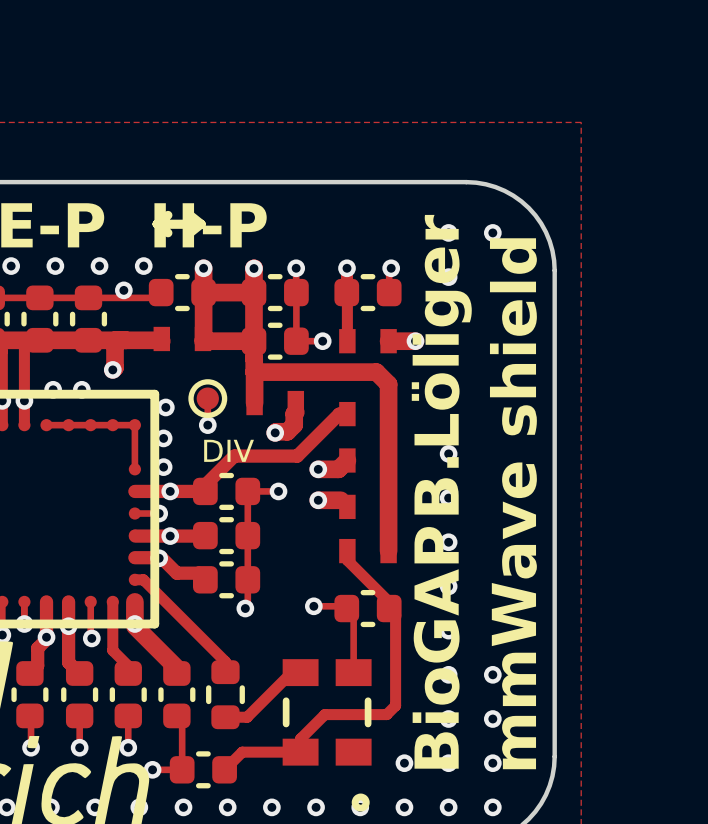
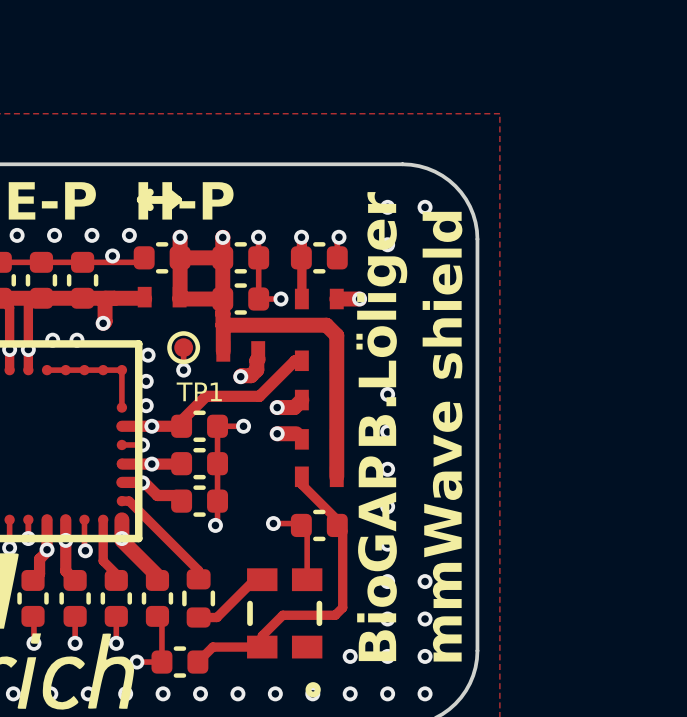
DIV name: DIV (229, 450) -> TP1 (199, 391)

